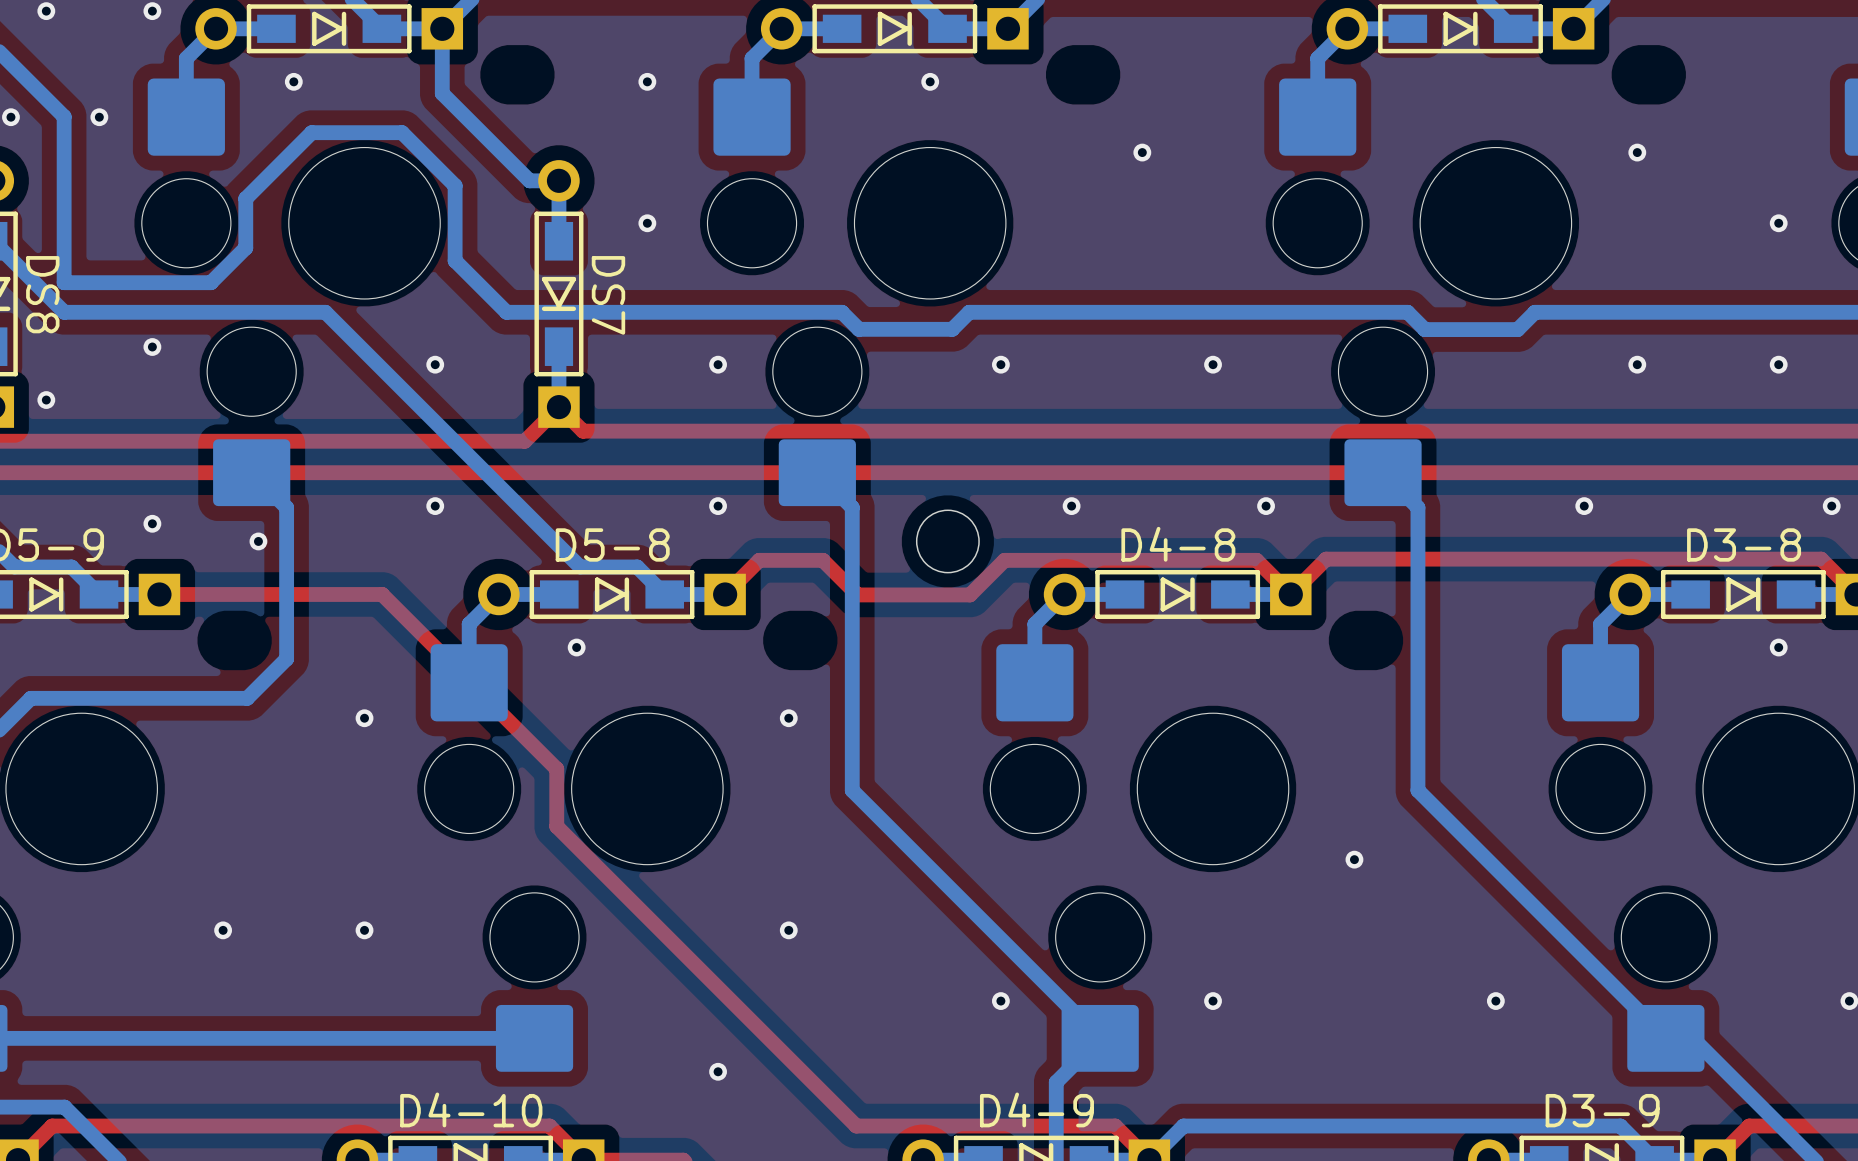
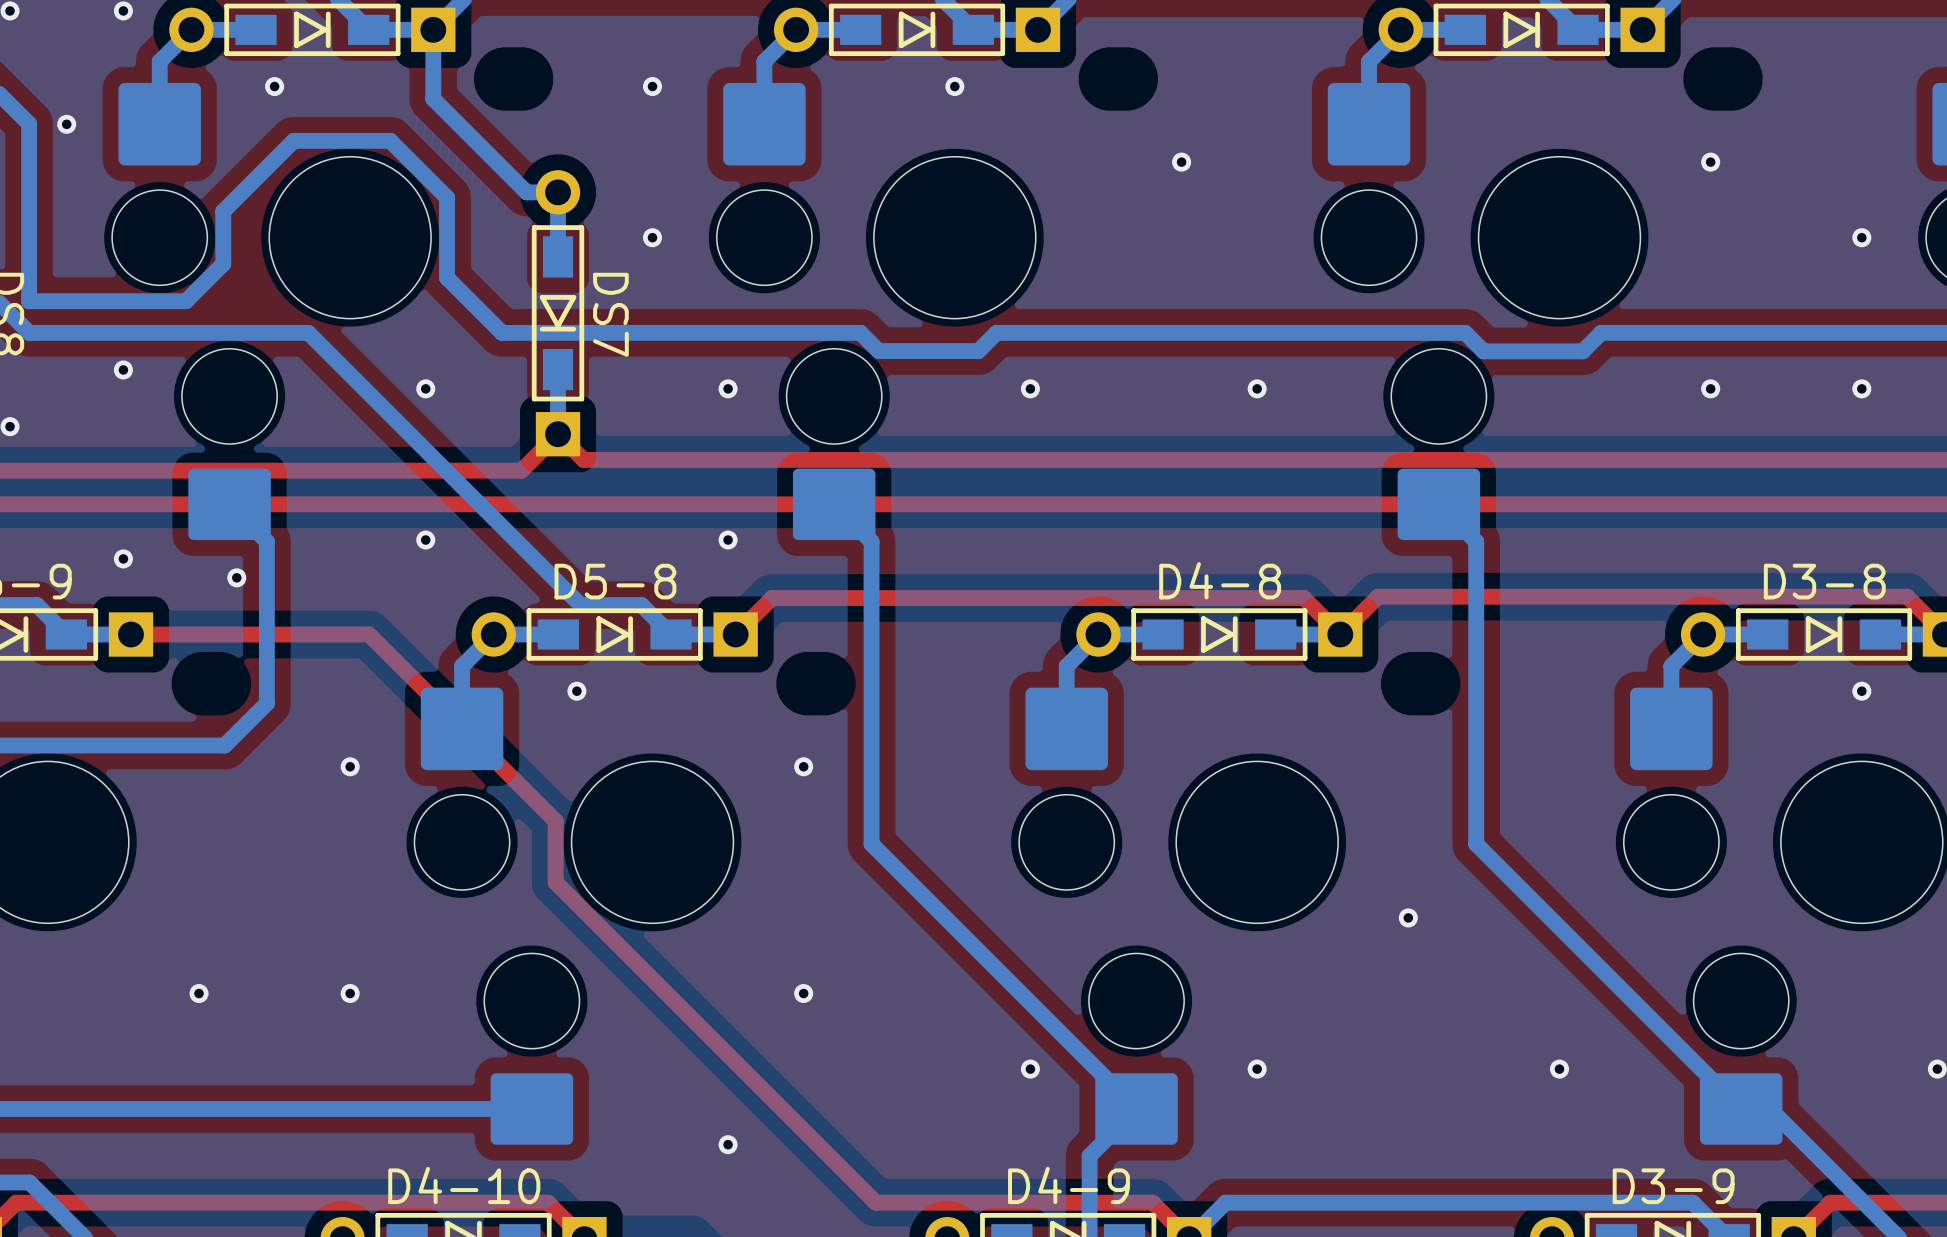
via: (1071, 506) -> none
via: (1266, 506) -> none
via: (1584, 506) -> none
via: (1831, 506) -> none
round board edge: [915, 509, 980, 574] -> none
top track: (1004, 560) (970, 594) (857, 594) (822, 560) -> (1034, 598) (840, 598)

